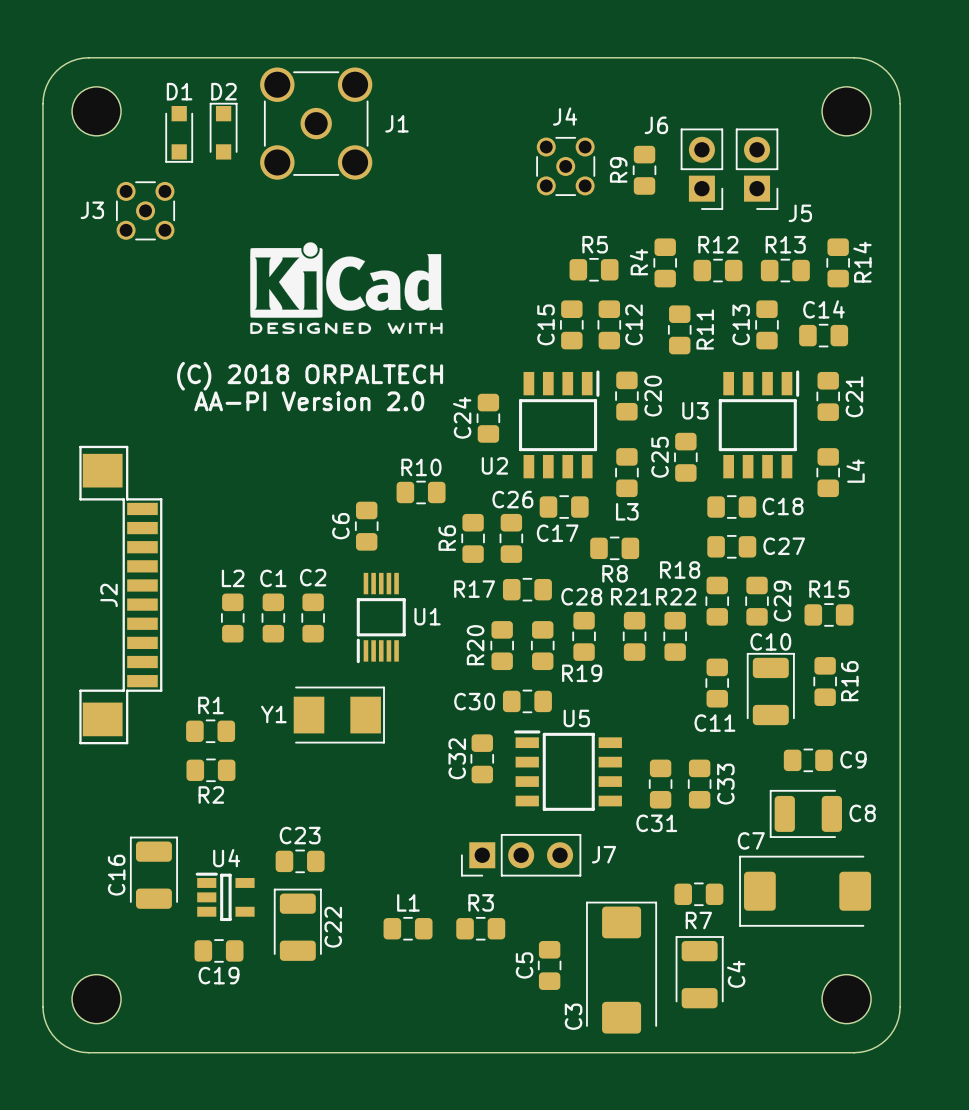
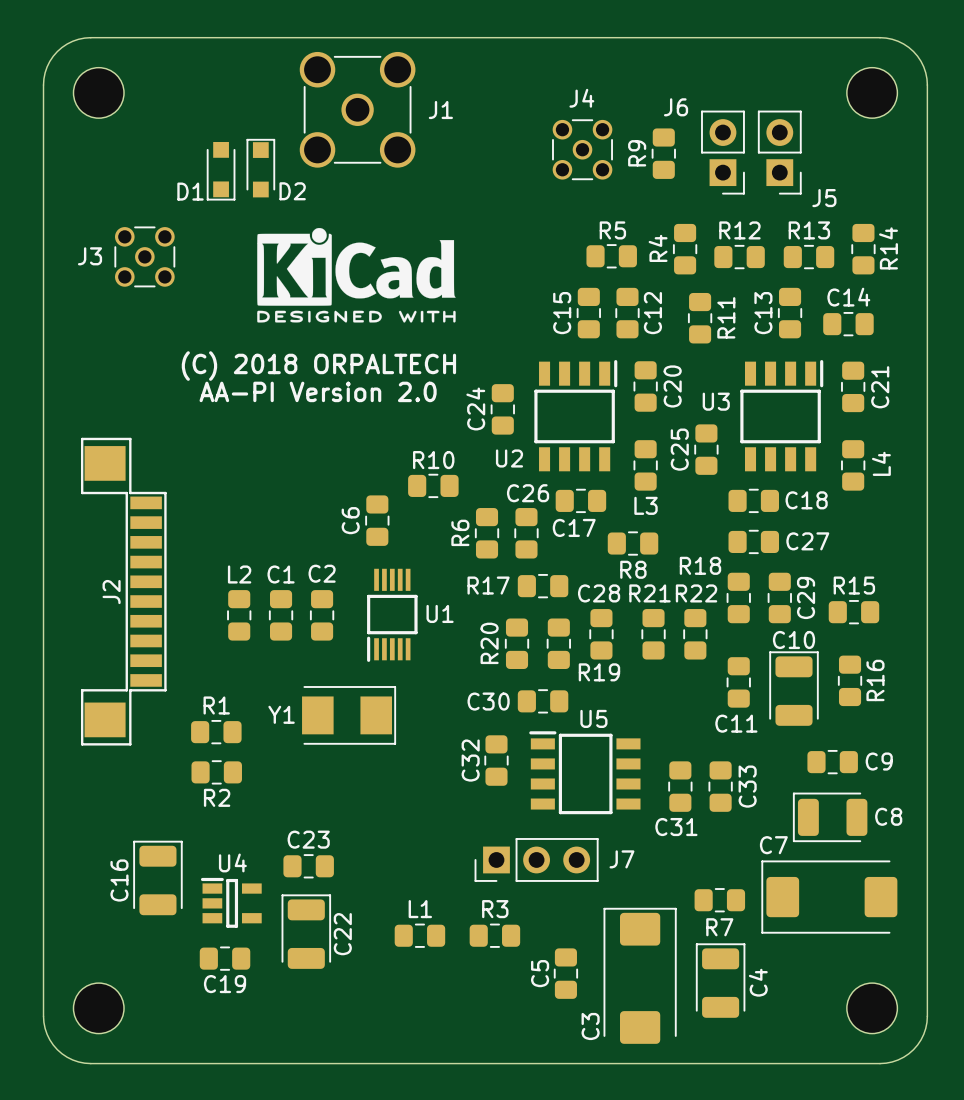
D1 name position: D1 (179, 91) -> D1 (190, 191)
D2 name position: D2 (223, 91) -> D2 (292, 191)
J1 position: (316, 123) -> (357, 109)
D2 position: (223, 131) -> (260, 168)
D1 position: (179, 134) -> (221, 171)
J3 position: (145, 210) -> (144, 256)

